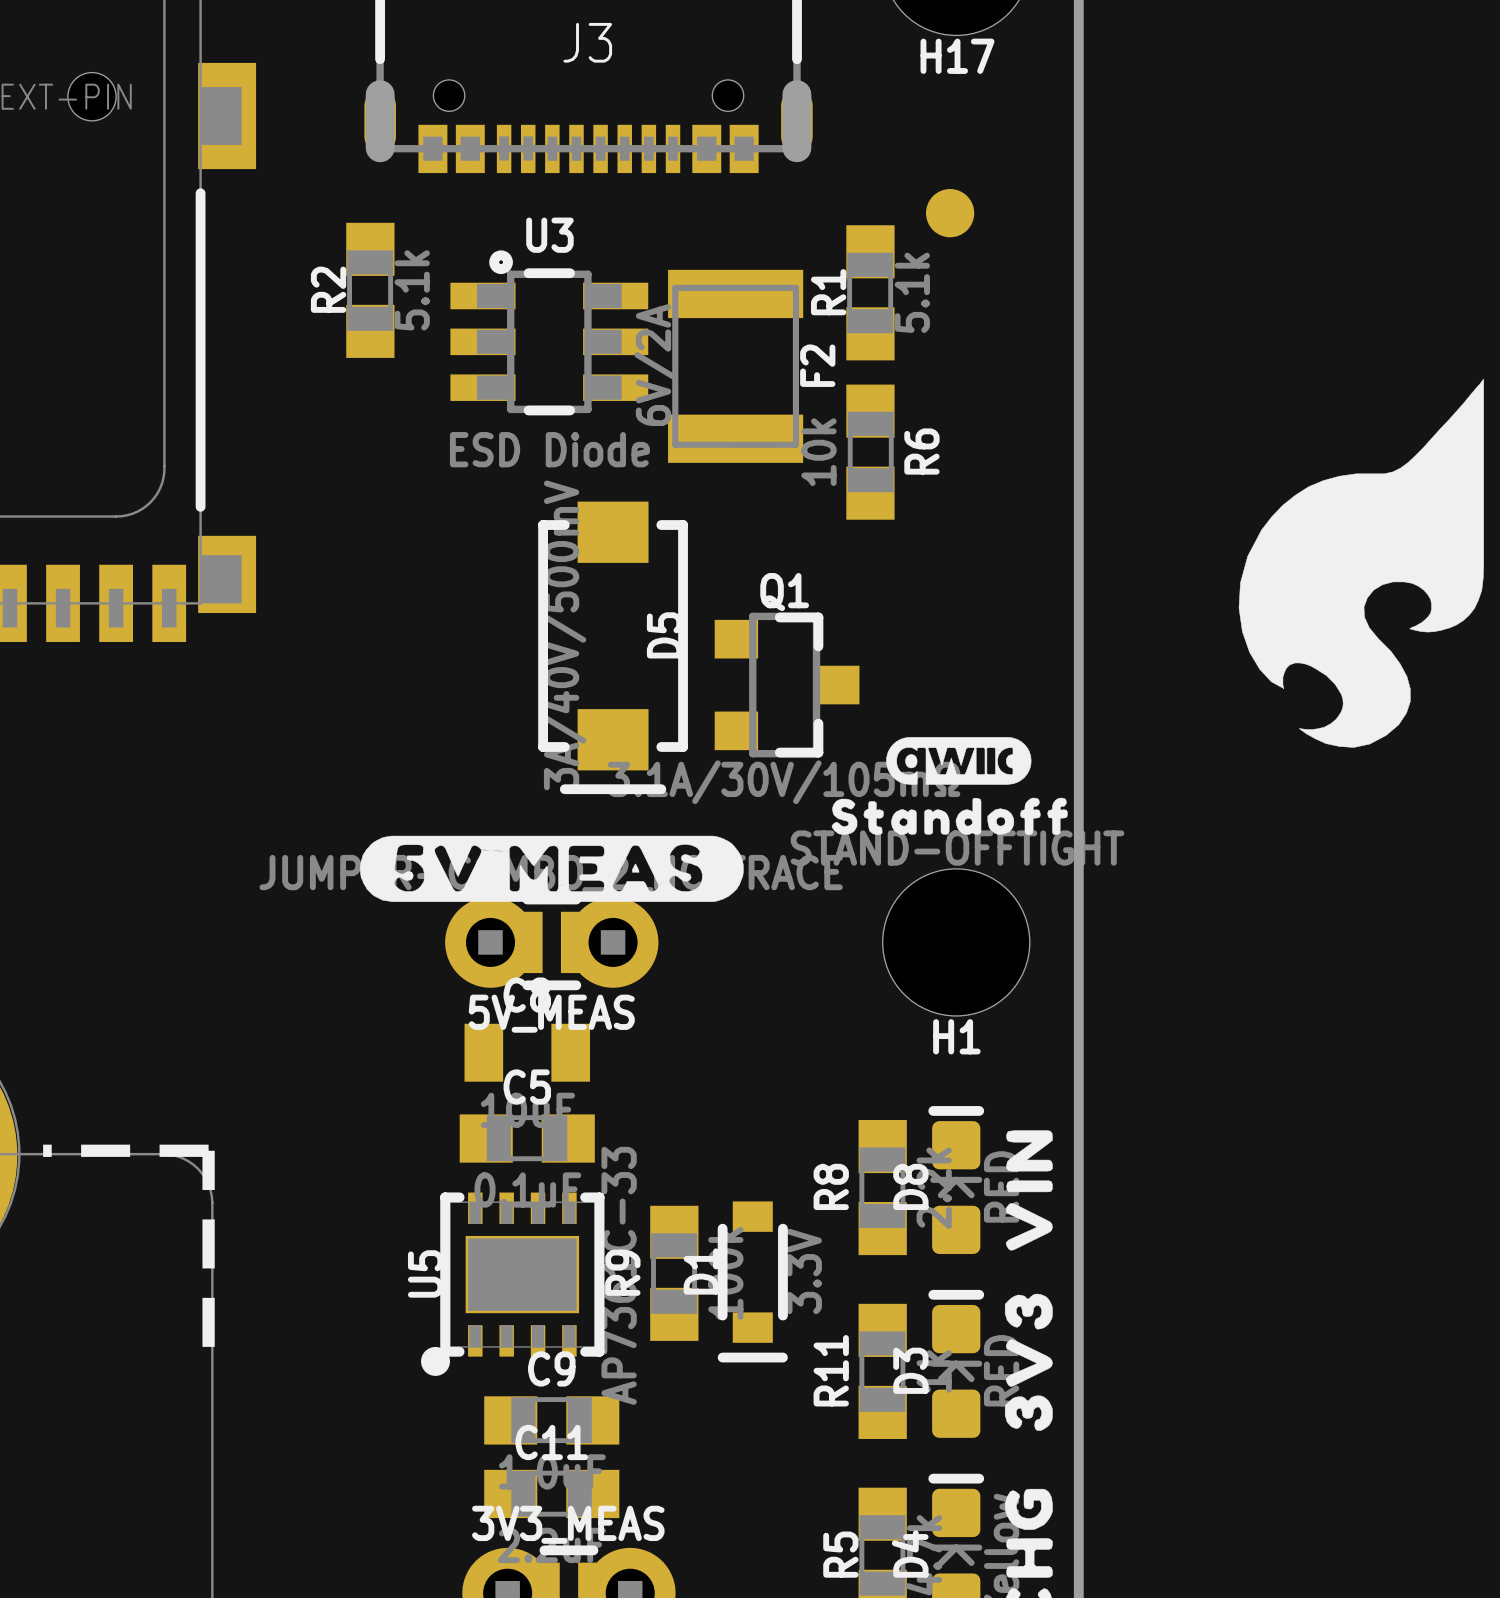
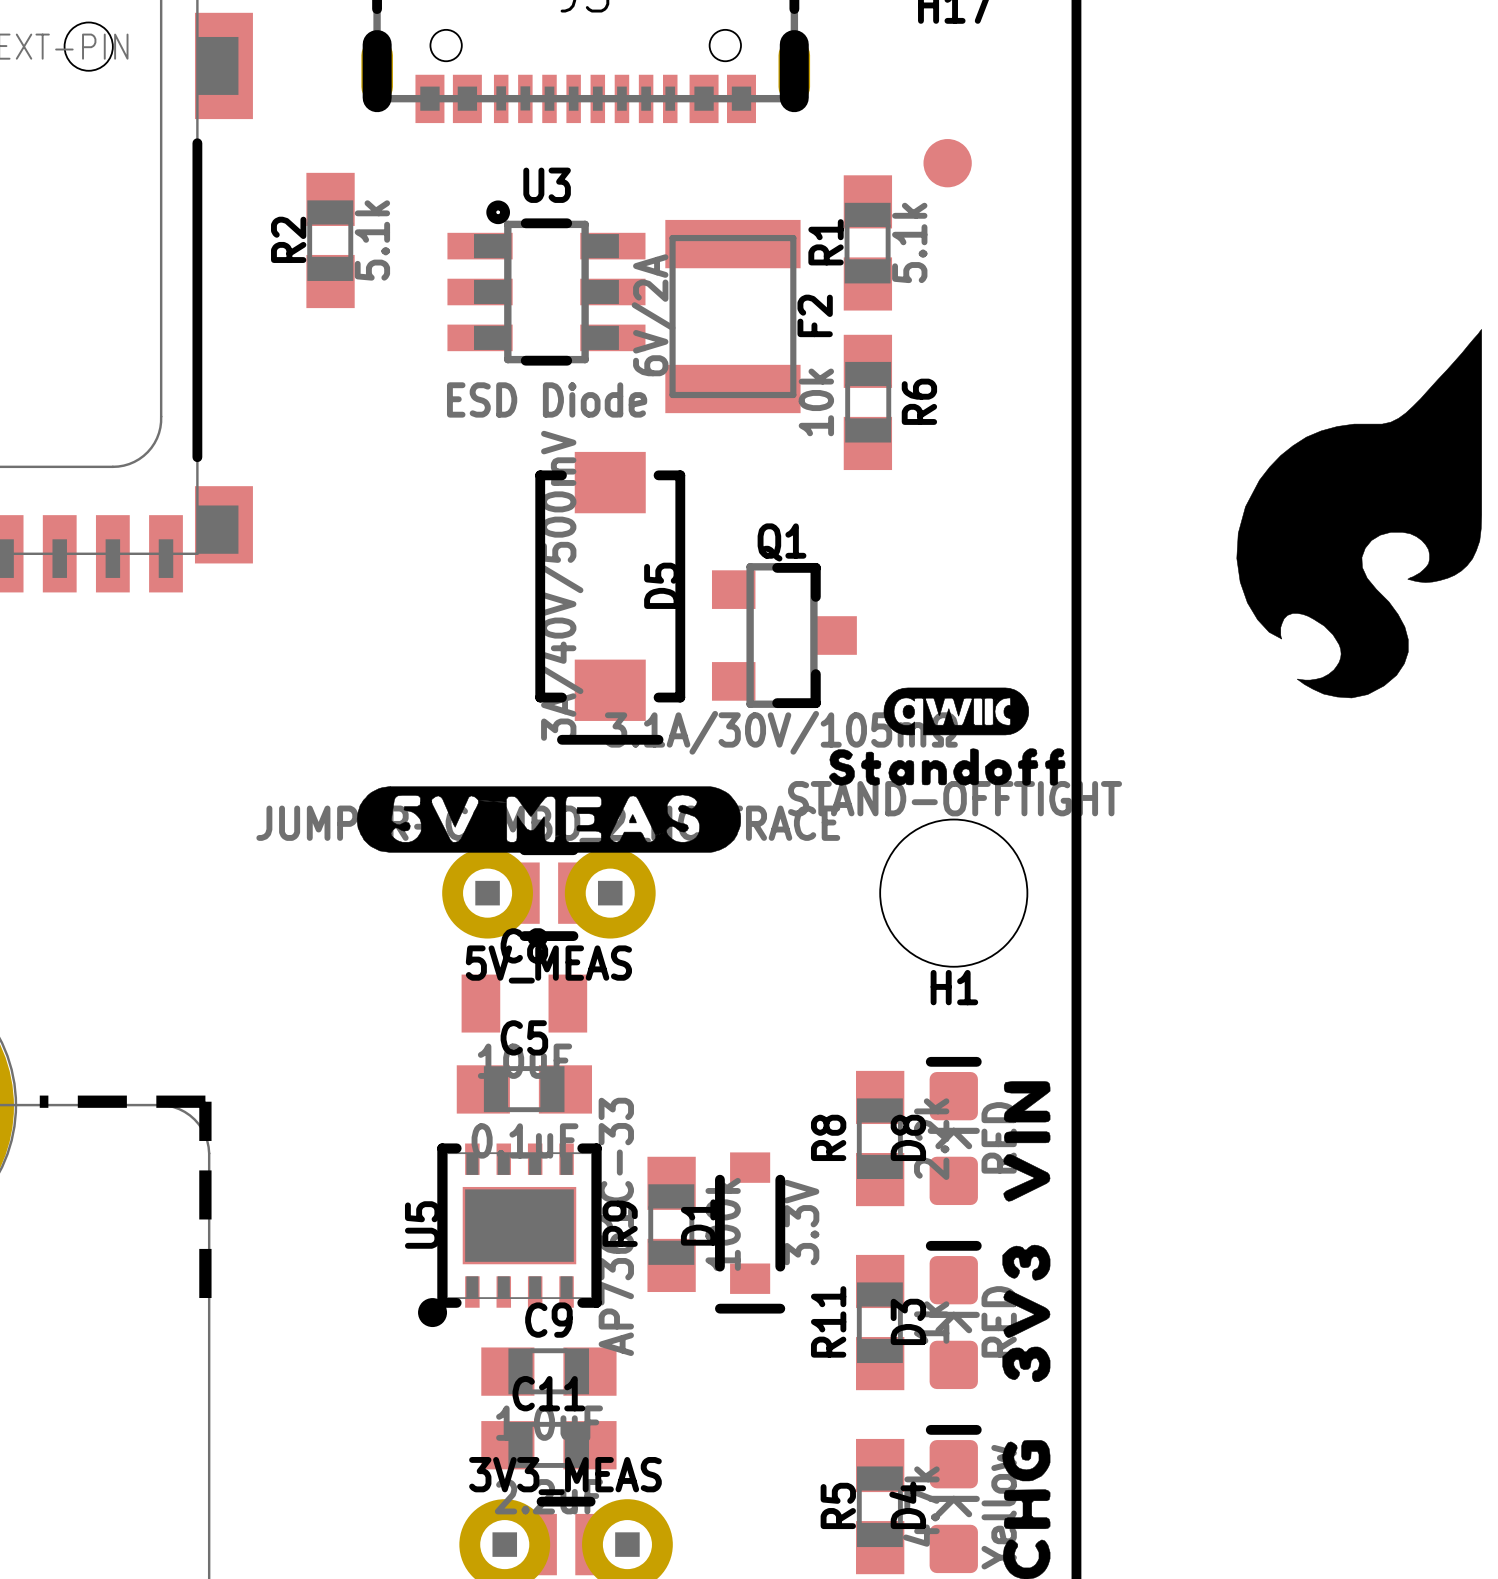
R2 position: (370, 290) -> (330, 240)

